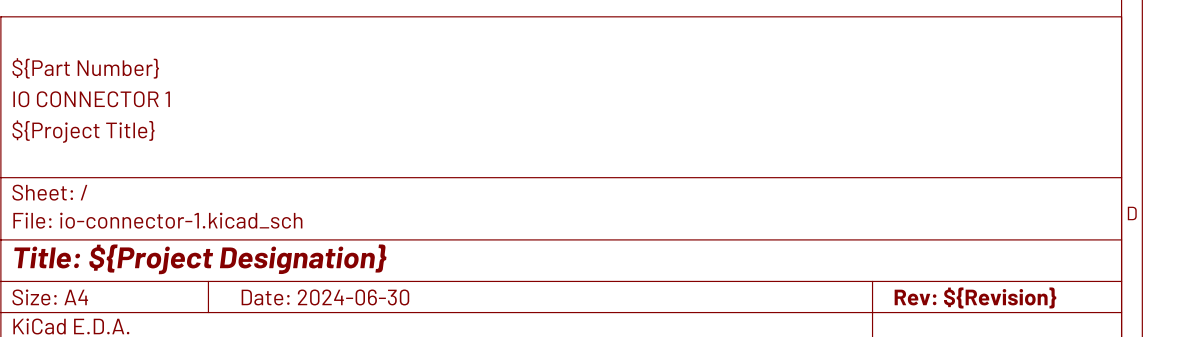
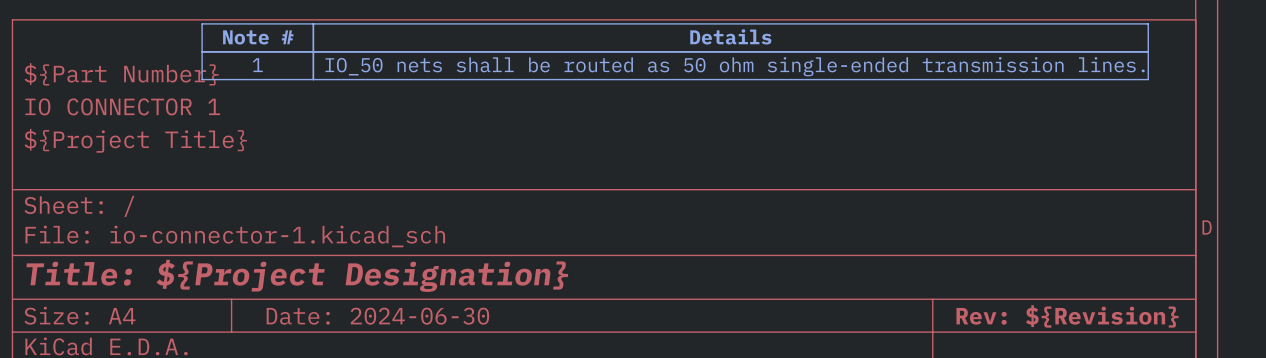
line: none -> (202, 23) (1148, 23) (1148, 79) (202, 79) (202, 23)
line: none -> (313, 23) (313, 79)
text: none -> Note # (258, 37)
text: none -> Details (730, 36)
line: none -> (202, 51) (1148, 51)
text: none -> 1 (257, 65)
text: none -> IO_50 nets shall be routed as 50 ohm single-ended transmission lines. (735, 66)

